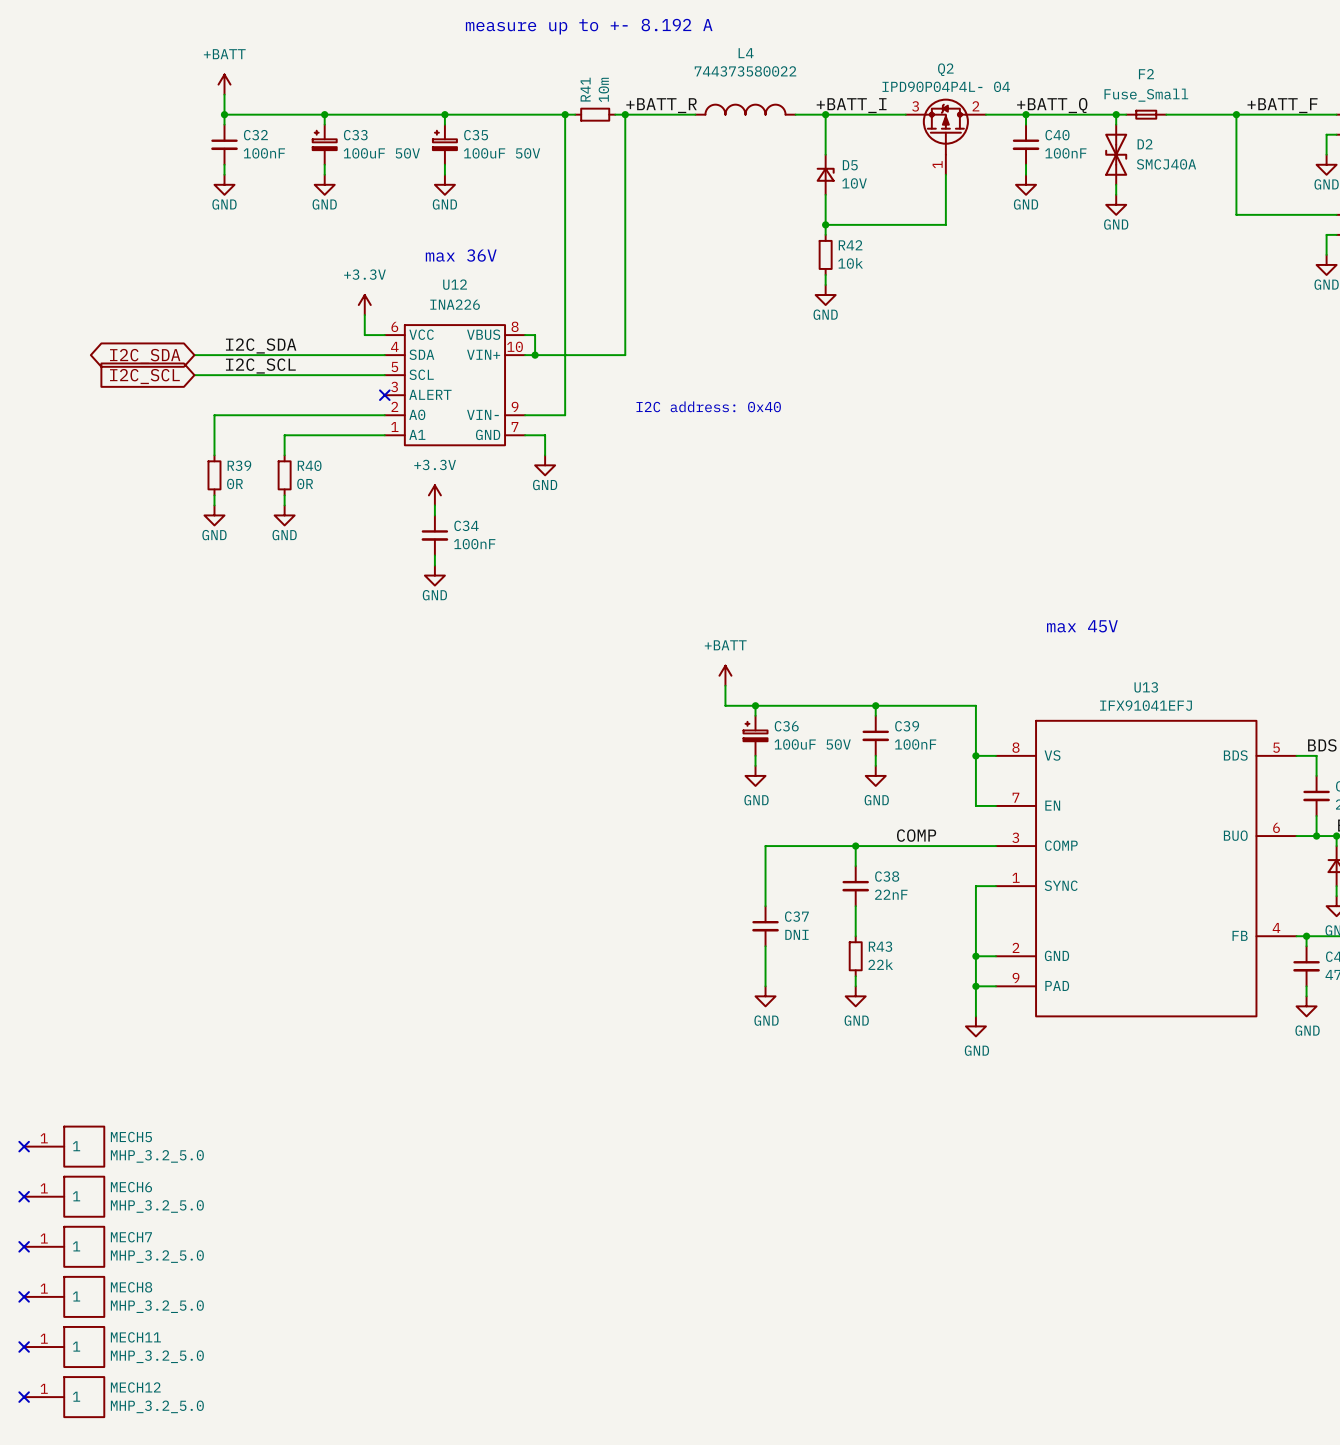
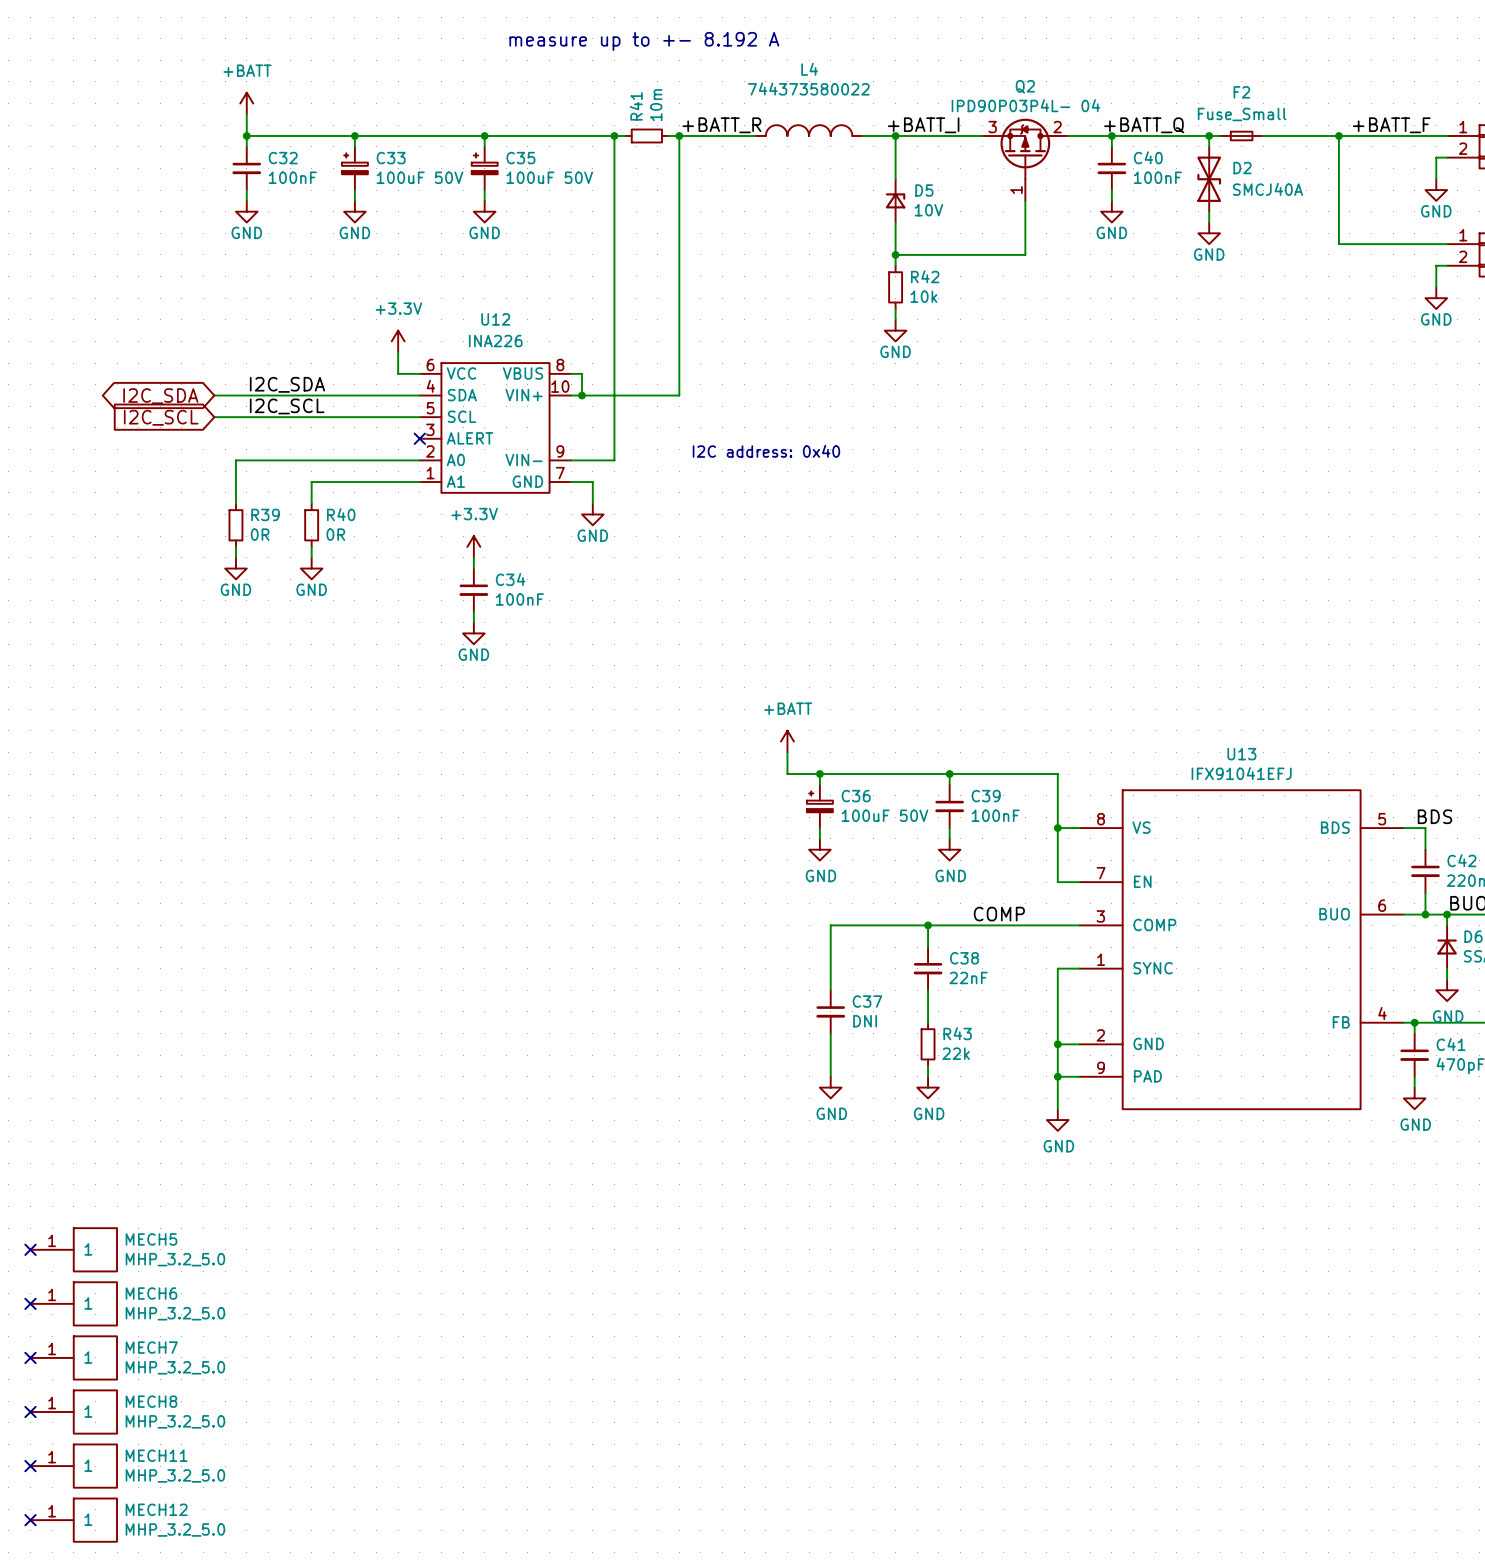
Q2 value: IPD90P04P4L- 04 (946, 86) -> IPD90P03P4L- 04 (1025, 105)
text: max 36V (461, 255) -> none
text: max 45V (1082, 626) -> none

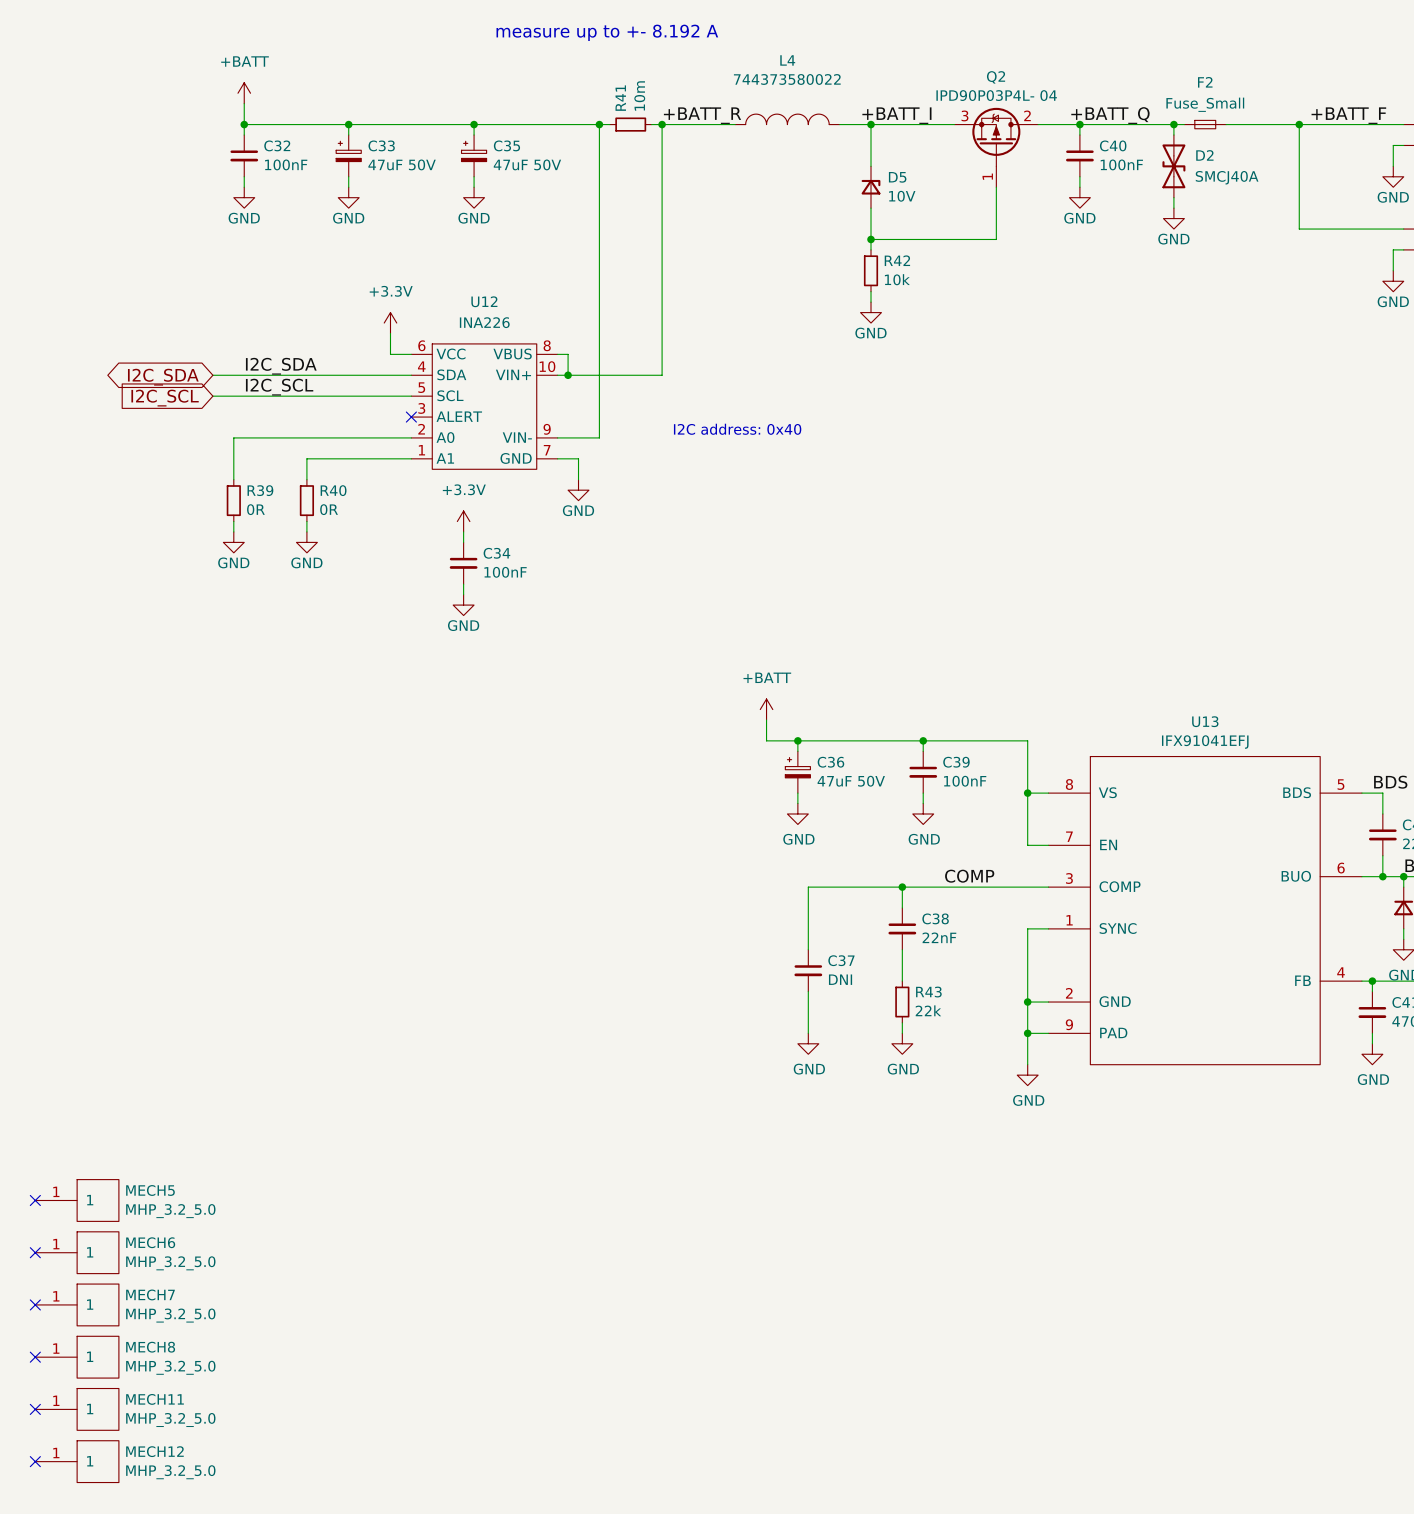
C33 value: 100uF 50V (419, 177) -> 47uF 50V (402, 164)
C35 value: 100uF 50V (549, 177) -> 47uF 50V (527, 164)
C36 value: 100uF 50V (884, 815) -> 47uF 50V (851, 781)

